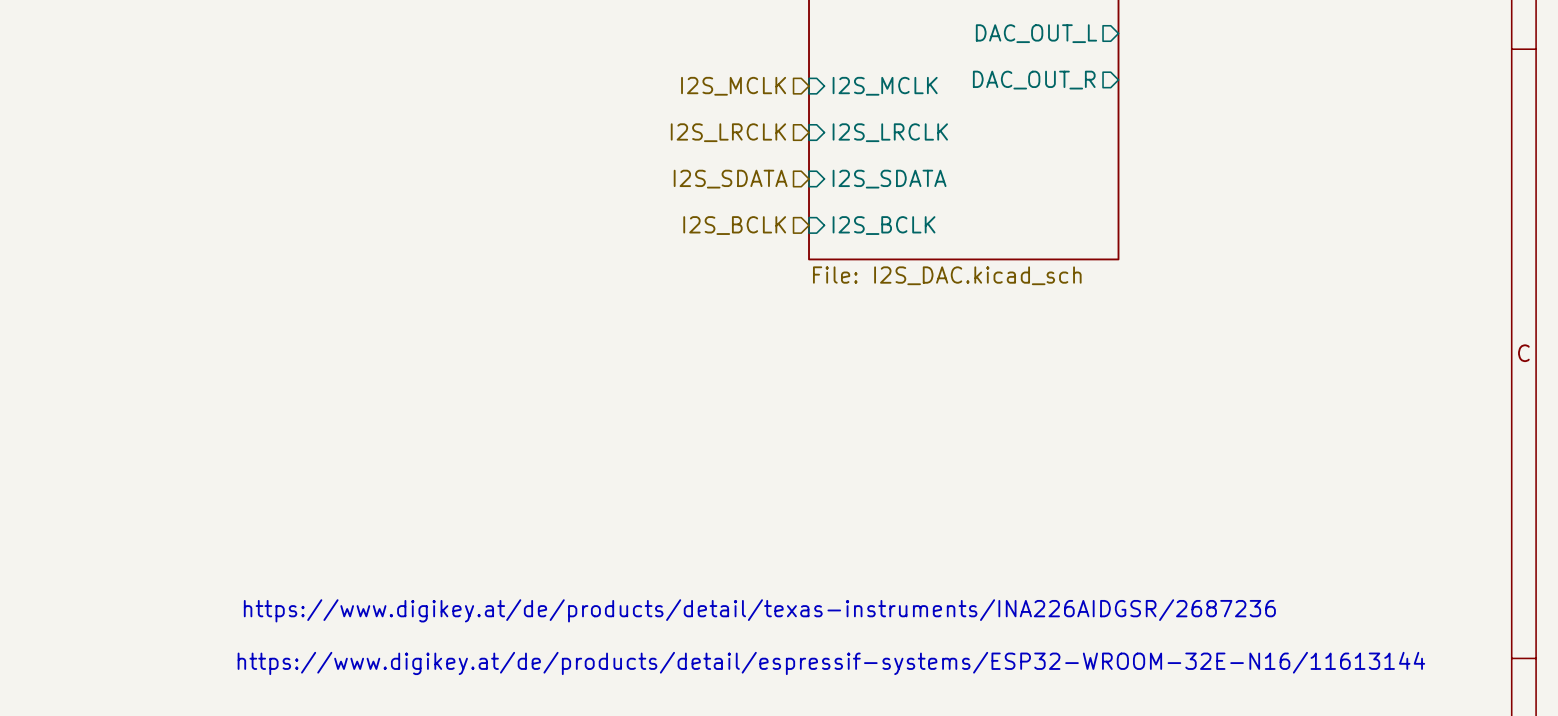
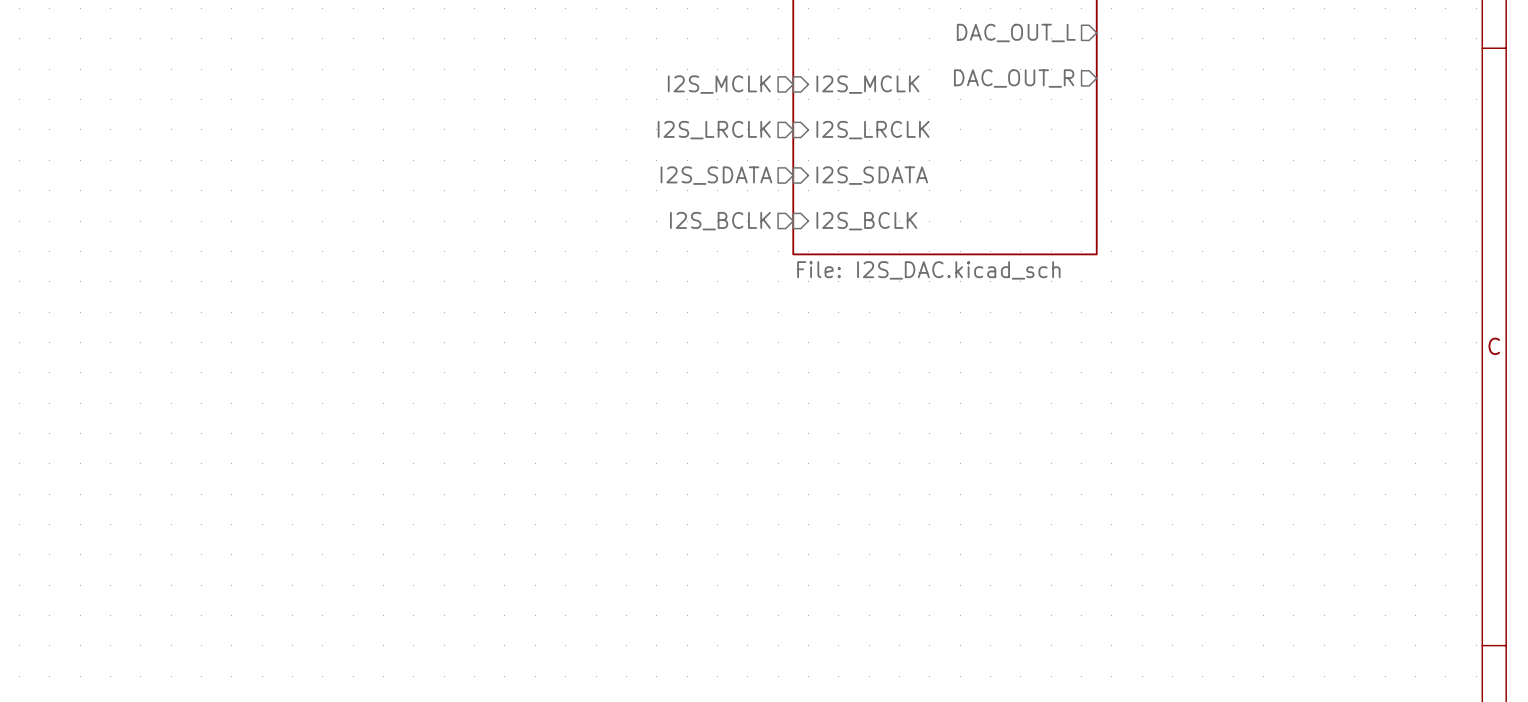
text: https://www.digikey.at/de/products/detail/texas-instruments/INA226AIDGSR/2687236 (759, 610) -> none
text: https://www.digikey.at/de/products/detail/espressif-systems/ESP32-WROOM-32E-N16/11613144 (831, 663) -> none

